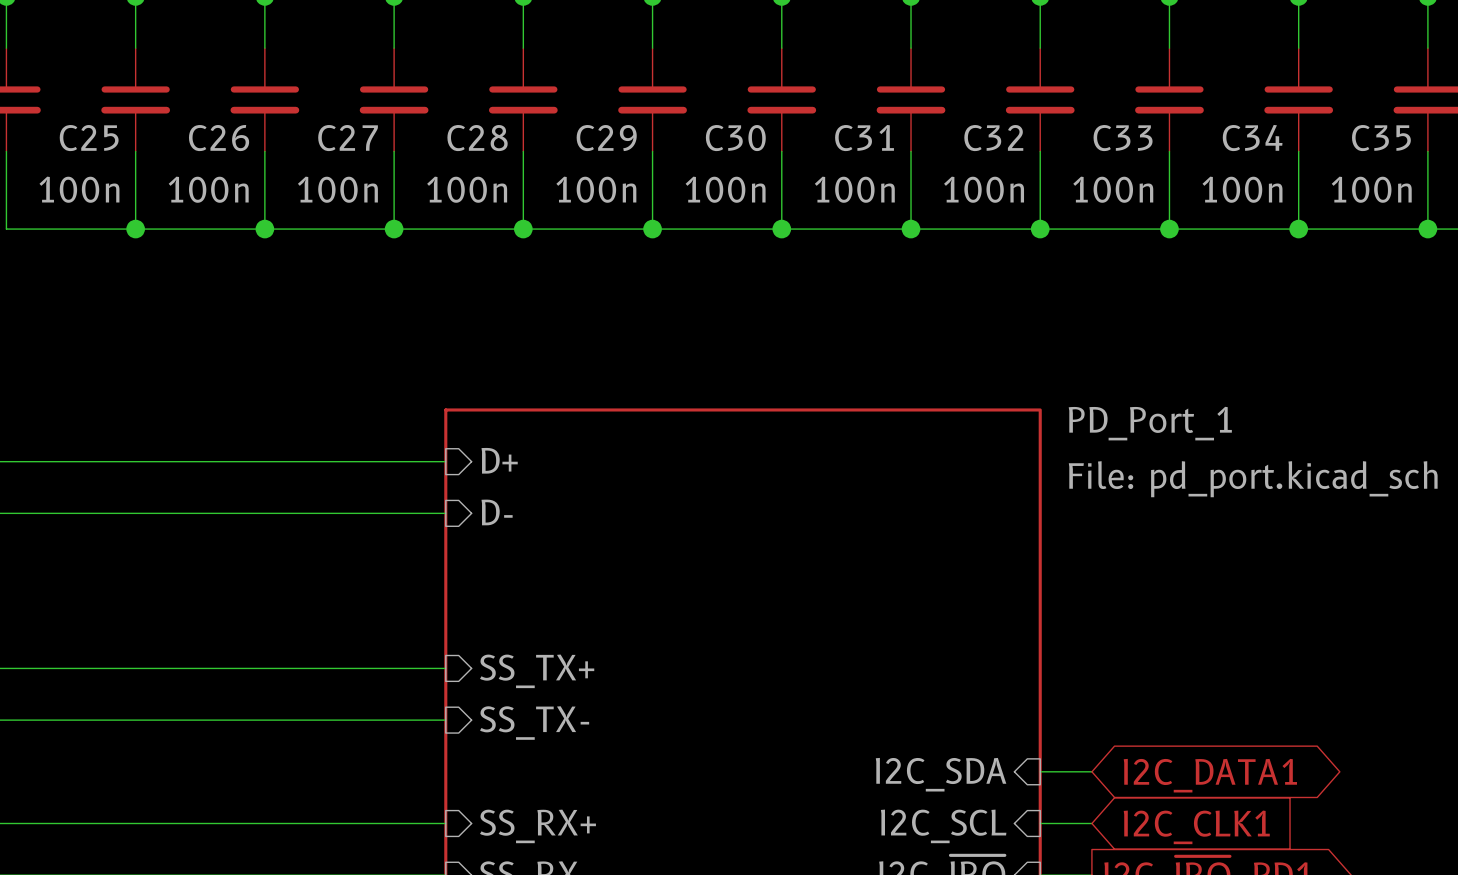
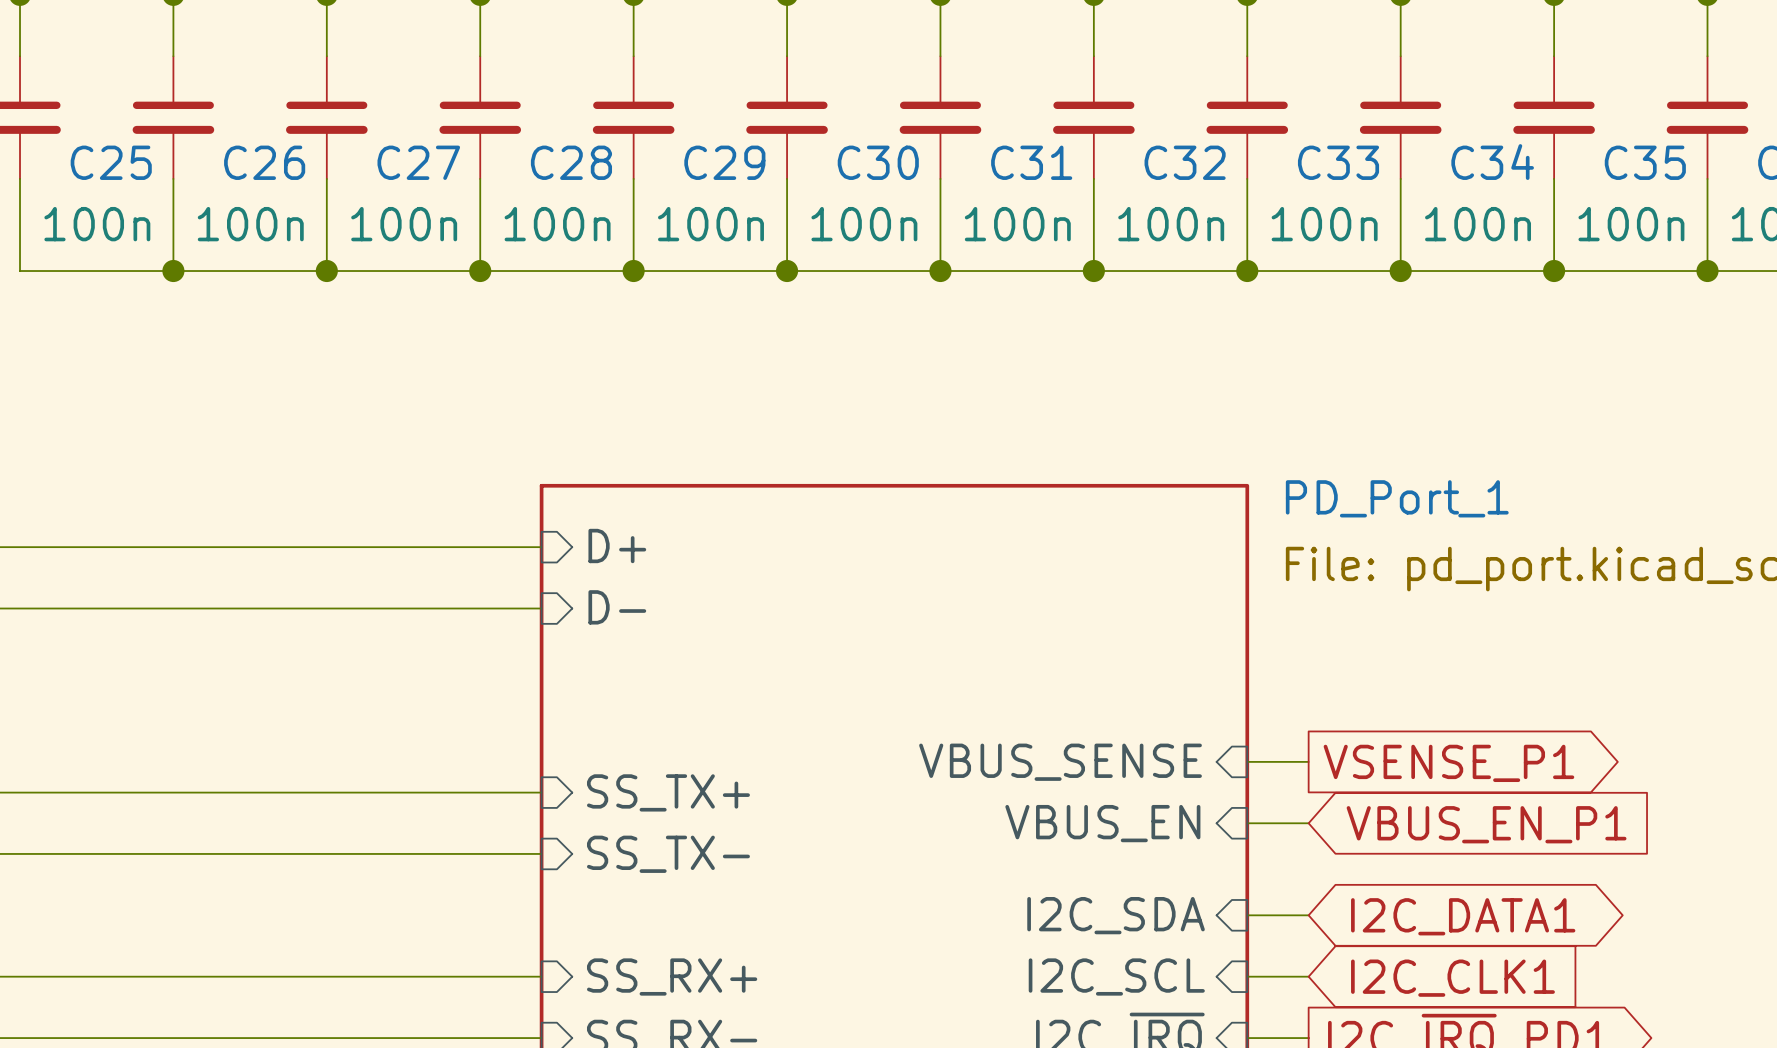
wire: none -> (1247, 761) (1308, 761)
sheet pin: none -> VBUS_SENSE (1060, 762)
global label: none -> VSENSE_P1 (1448, 763)
wire: none -> (1247, 823) (1308, 823)
sheet pin: none -> VBUS_EN (1102, 823)
global label: none -> VBUS_EN_P1 (1486, 824)

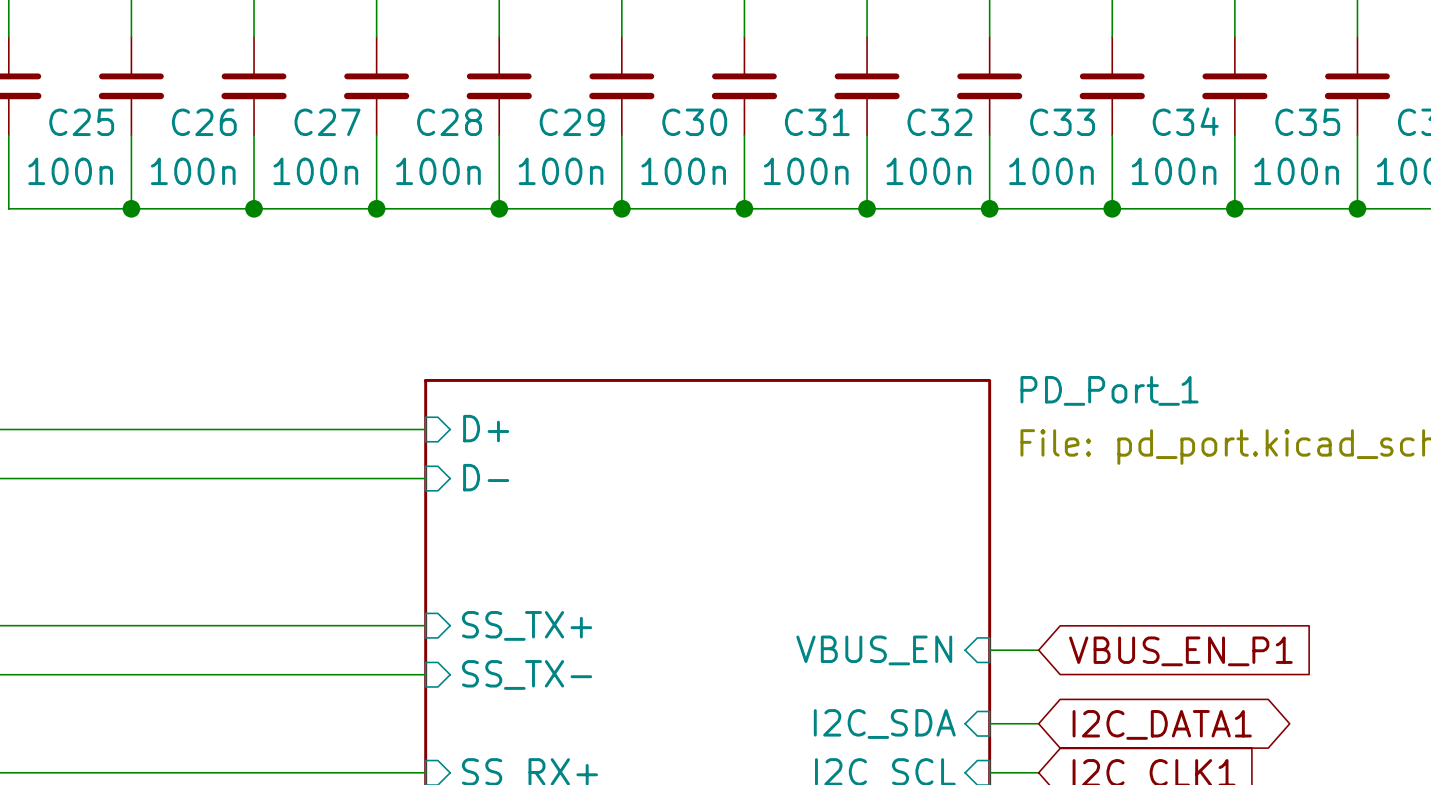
wire: (1247, 761) (1308, 761) -> none
sheet pin: VBUS_SENSE (1060, 762) -> none
global label: VSENSE_P1 (1448, 763) -> none

